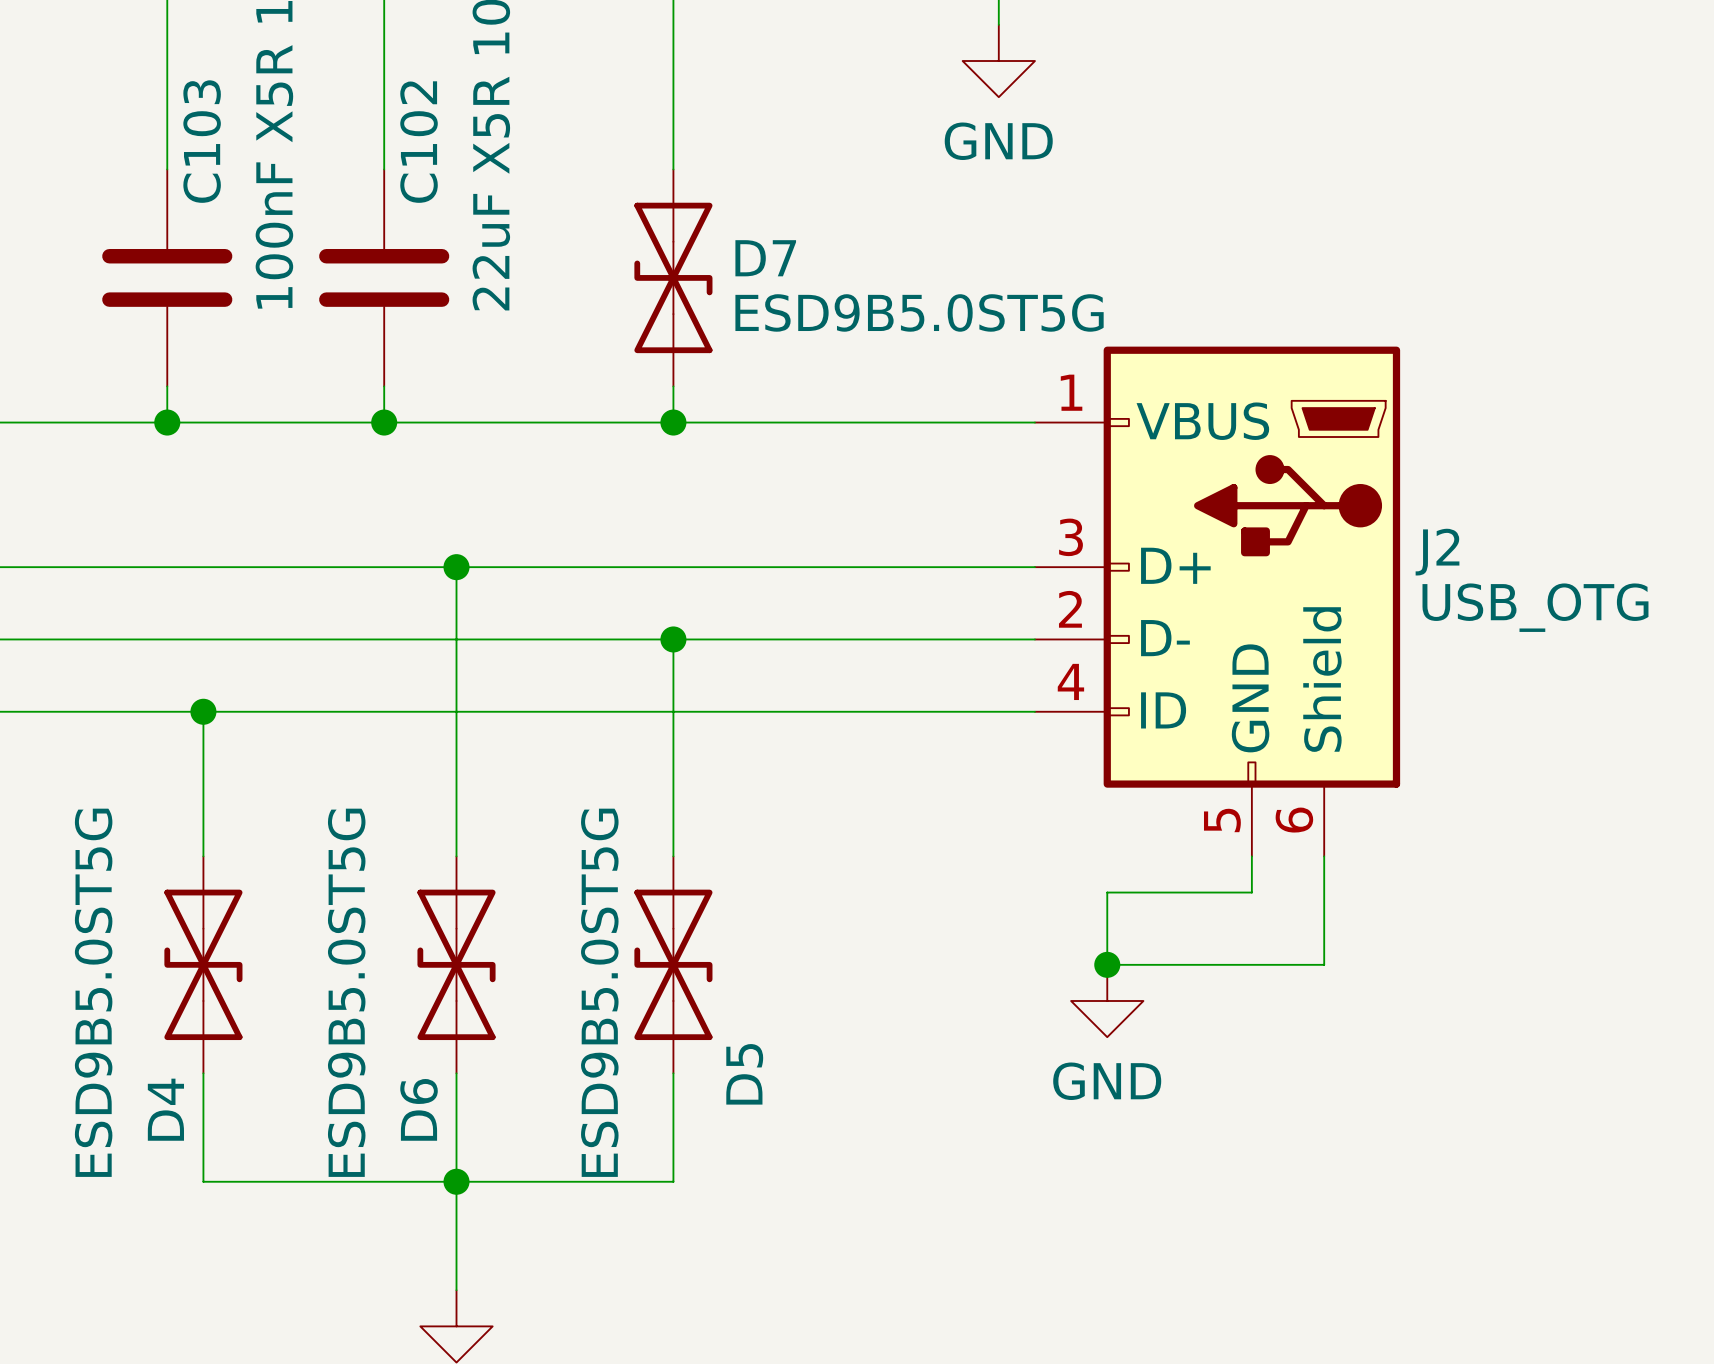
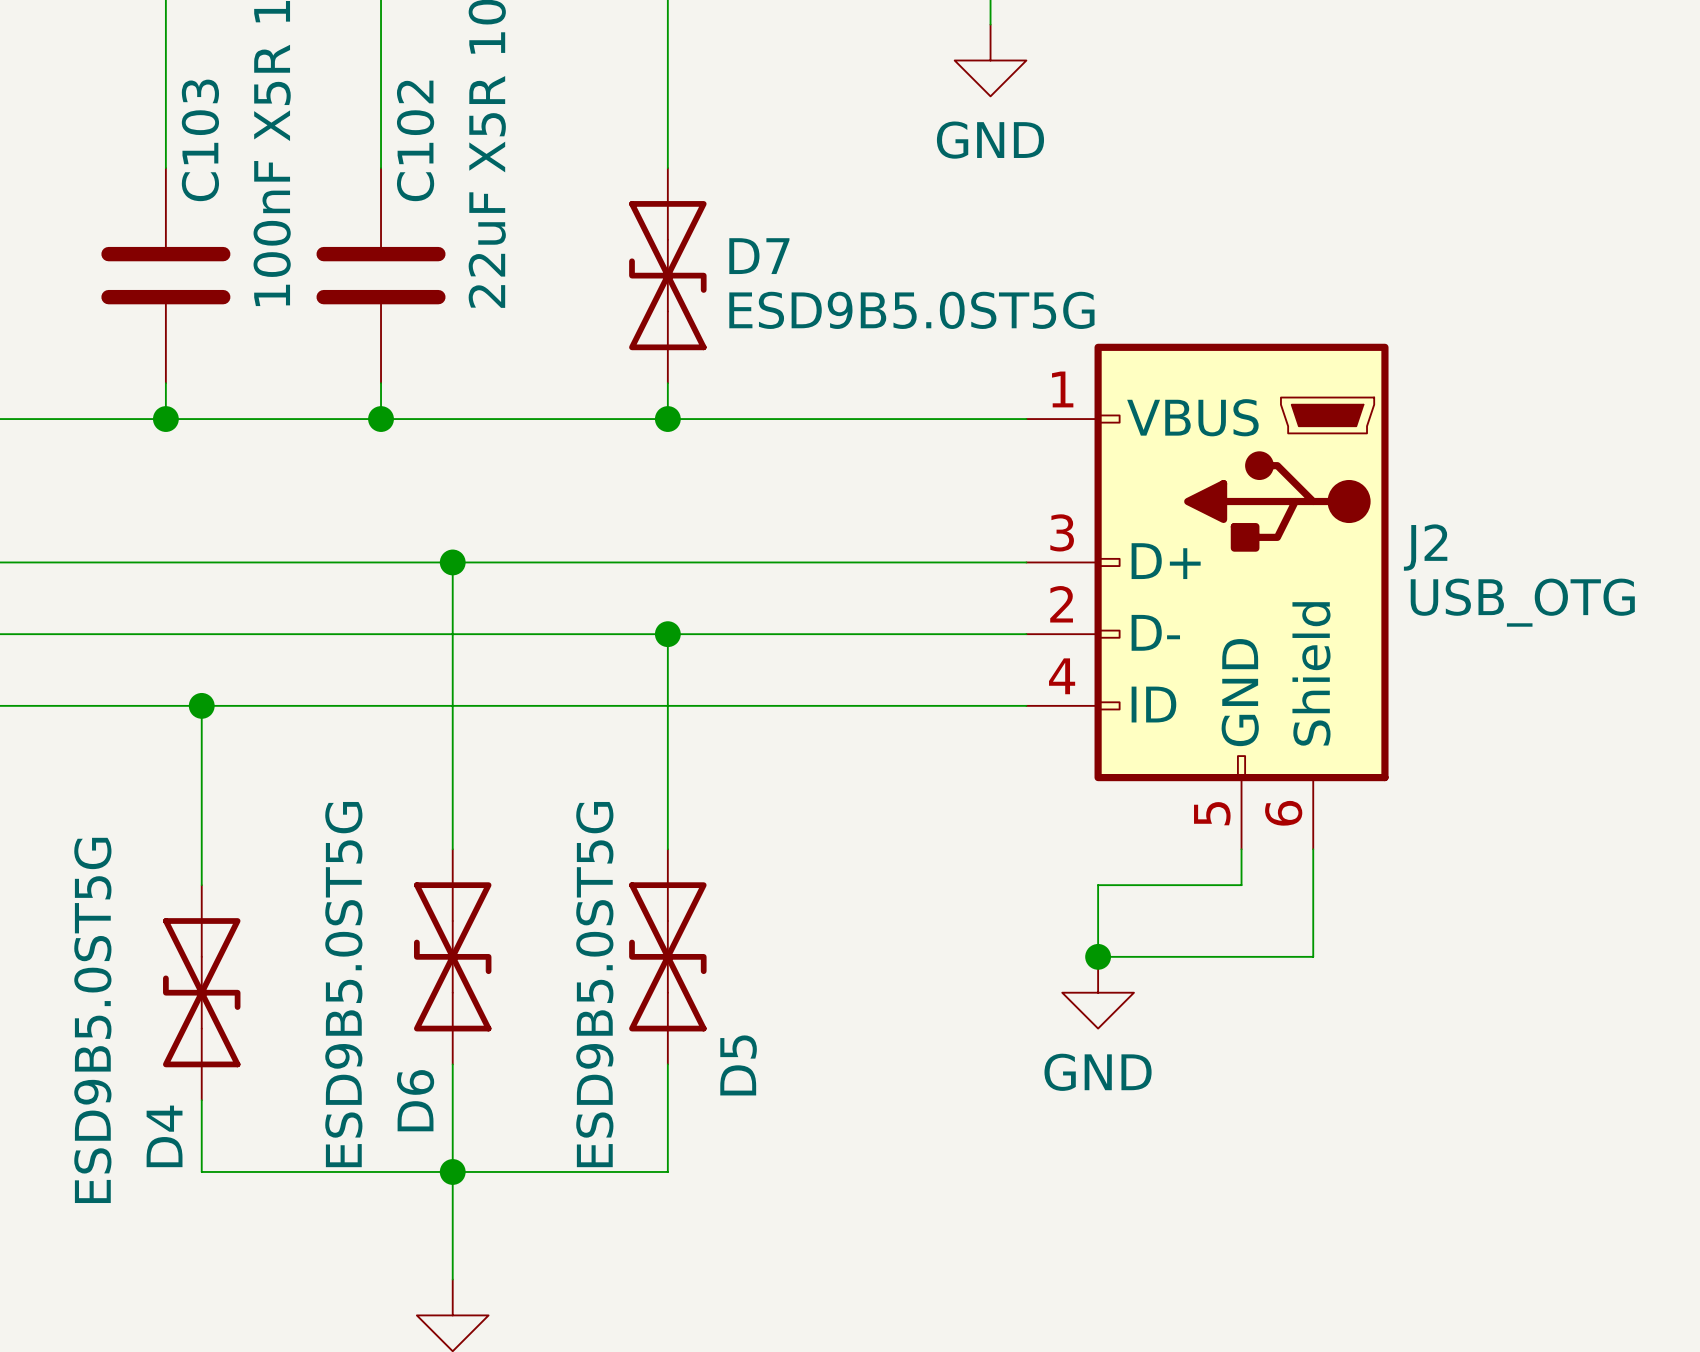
D4 position: (203, 964) -> (201, 992)

